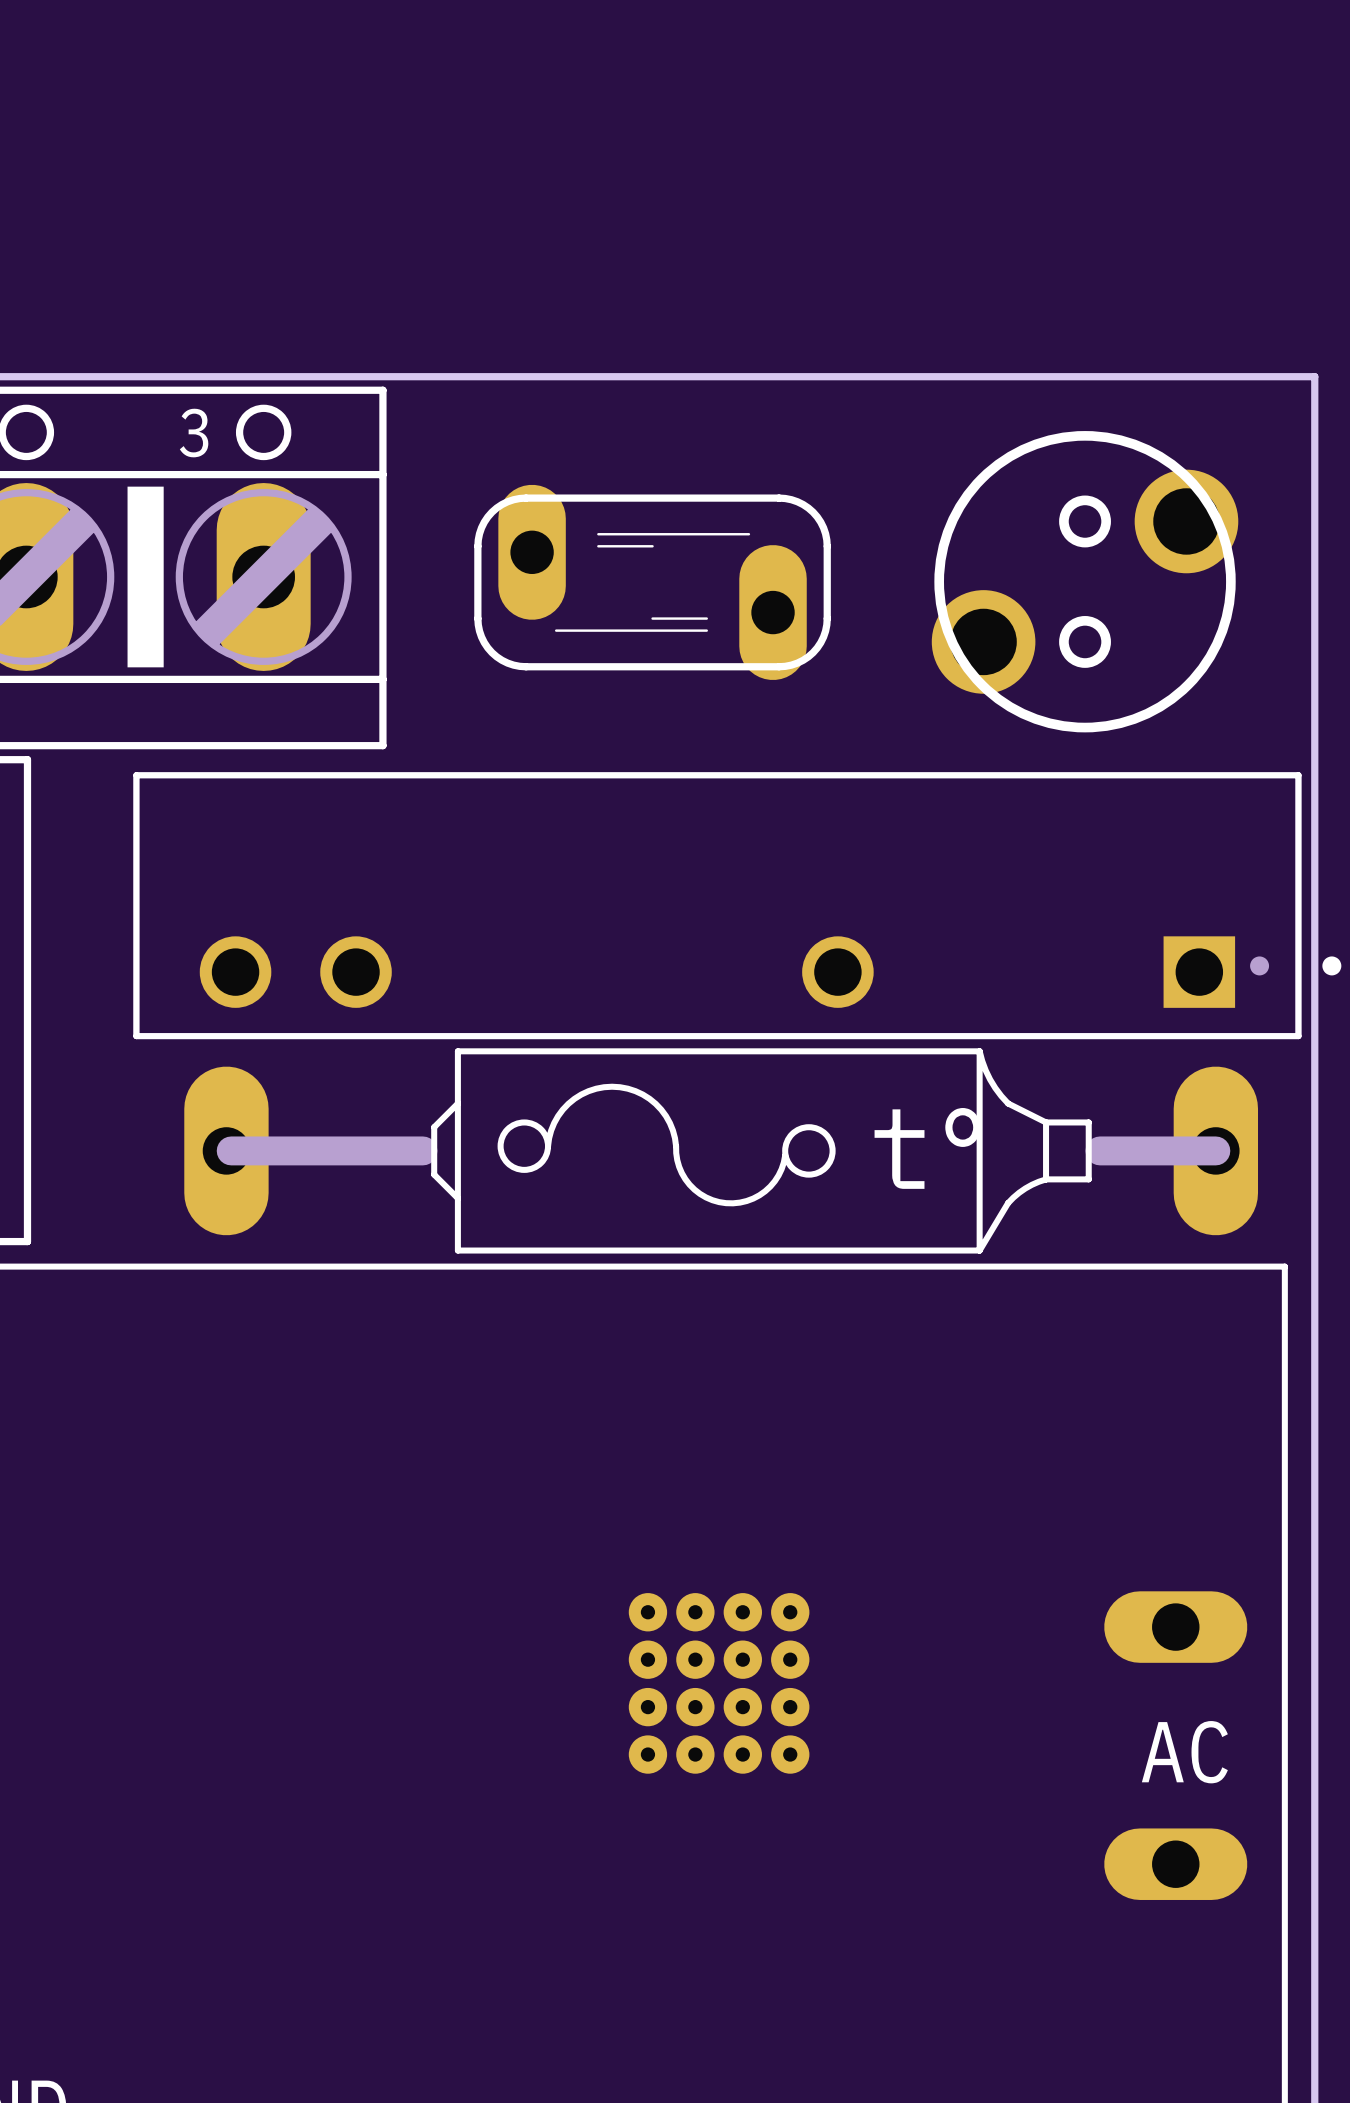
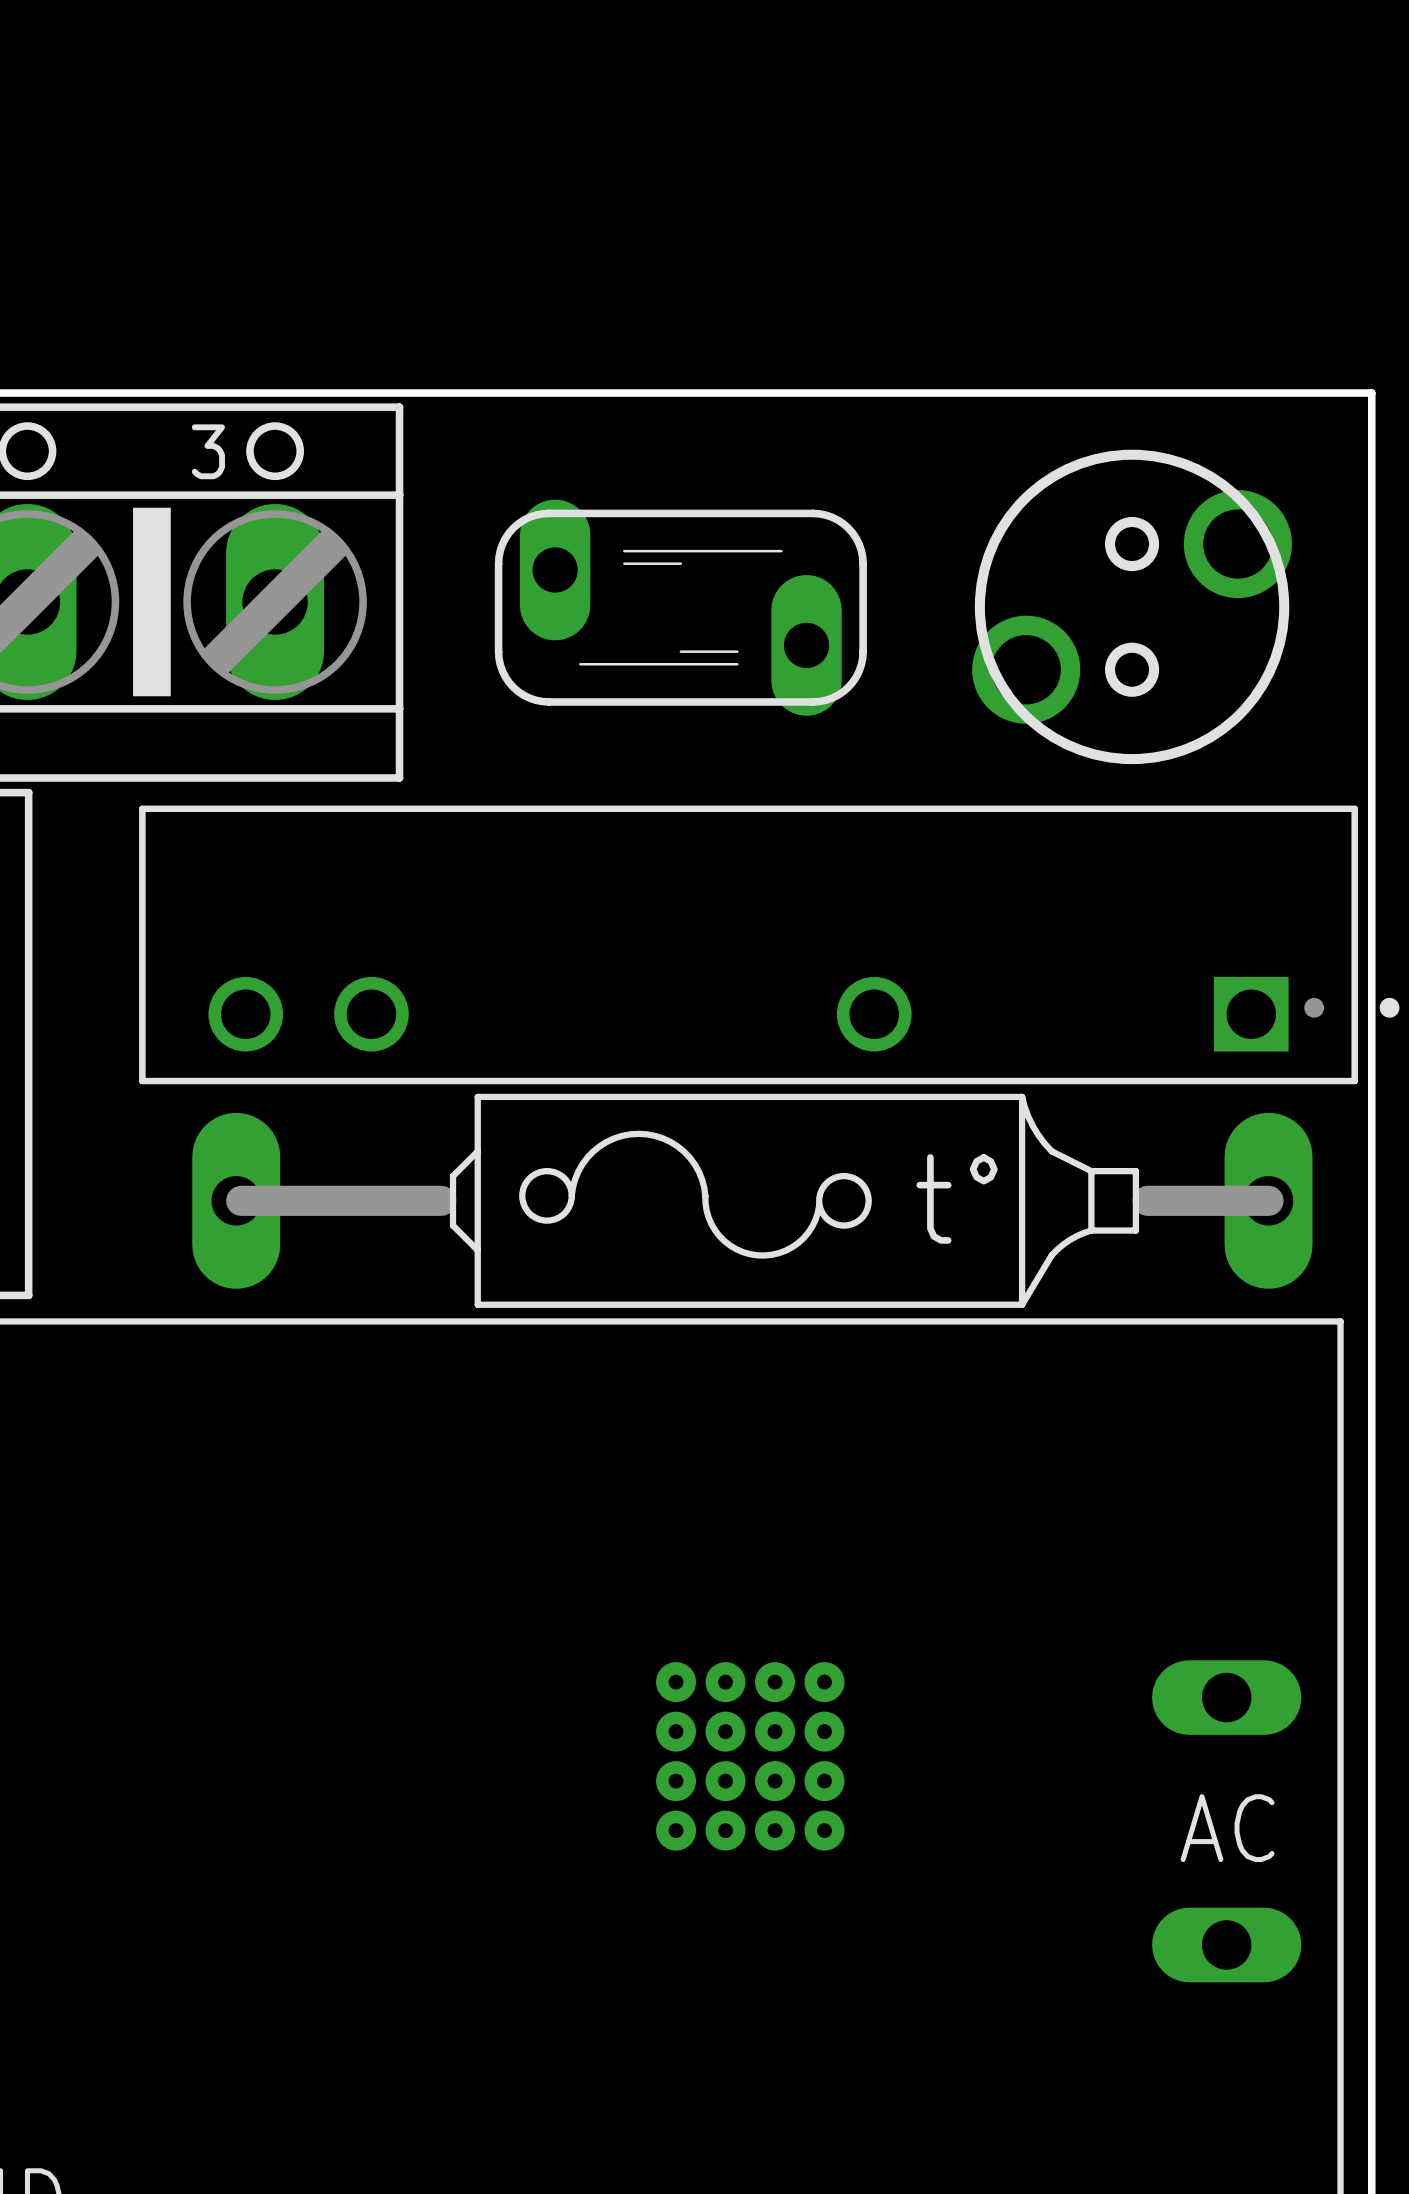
part footprint: [474, 484, 831, 681] -> [494, 499, 867, 716]

